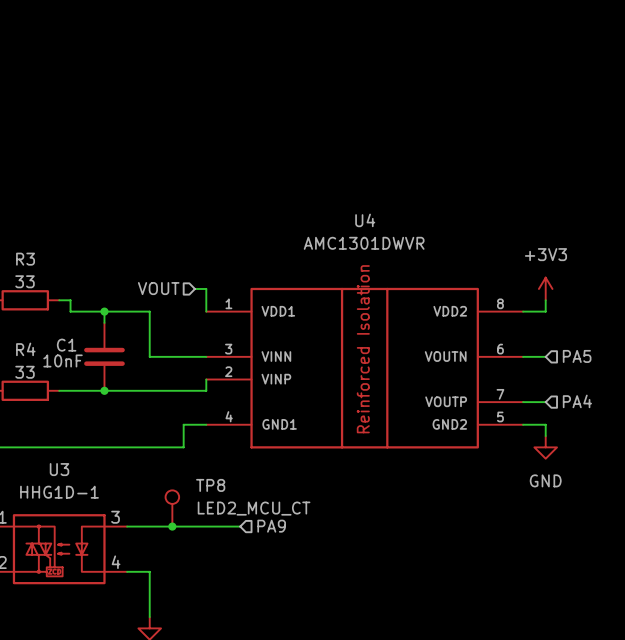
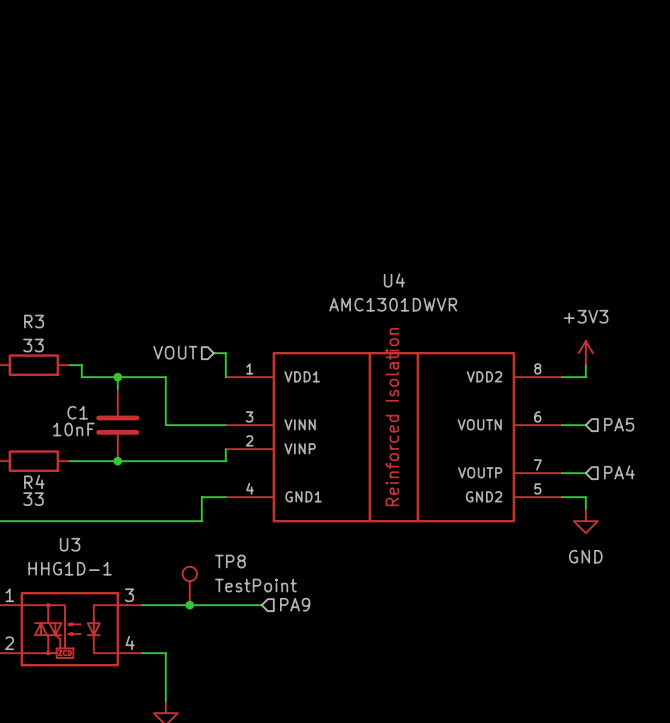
R4 name position: R4 (25, 349) -> R4 (34, 482)
R4 value position: 33 (25, 372) -> 33 (33, 499)
TP8 value: LED2_MCU_CT (254, 508) -> TestPoint (255, 585)

